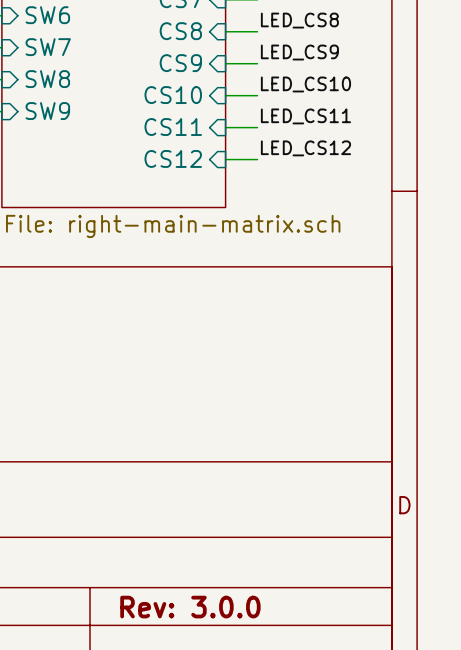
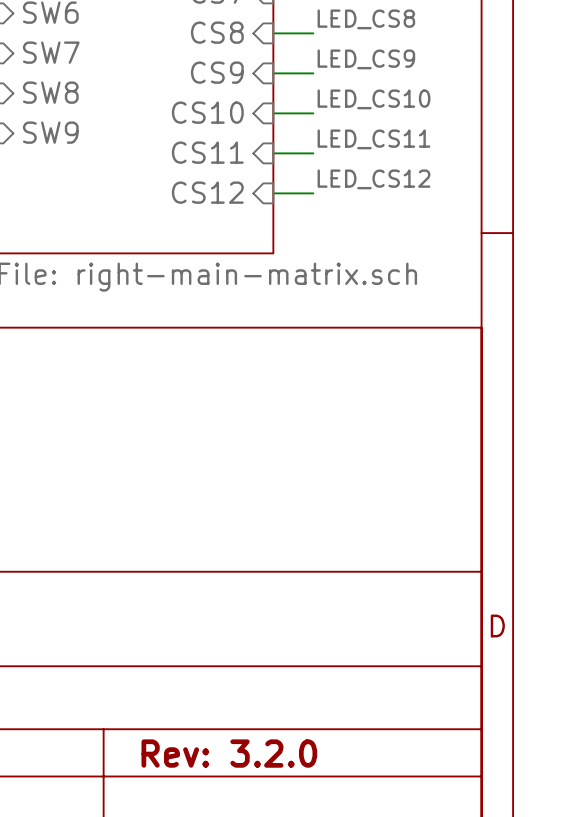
title block: Rev: 3.0.0 (190, 607) -> Rev: 3.2.0 (229, 753)

